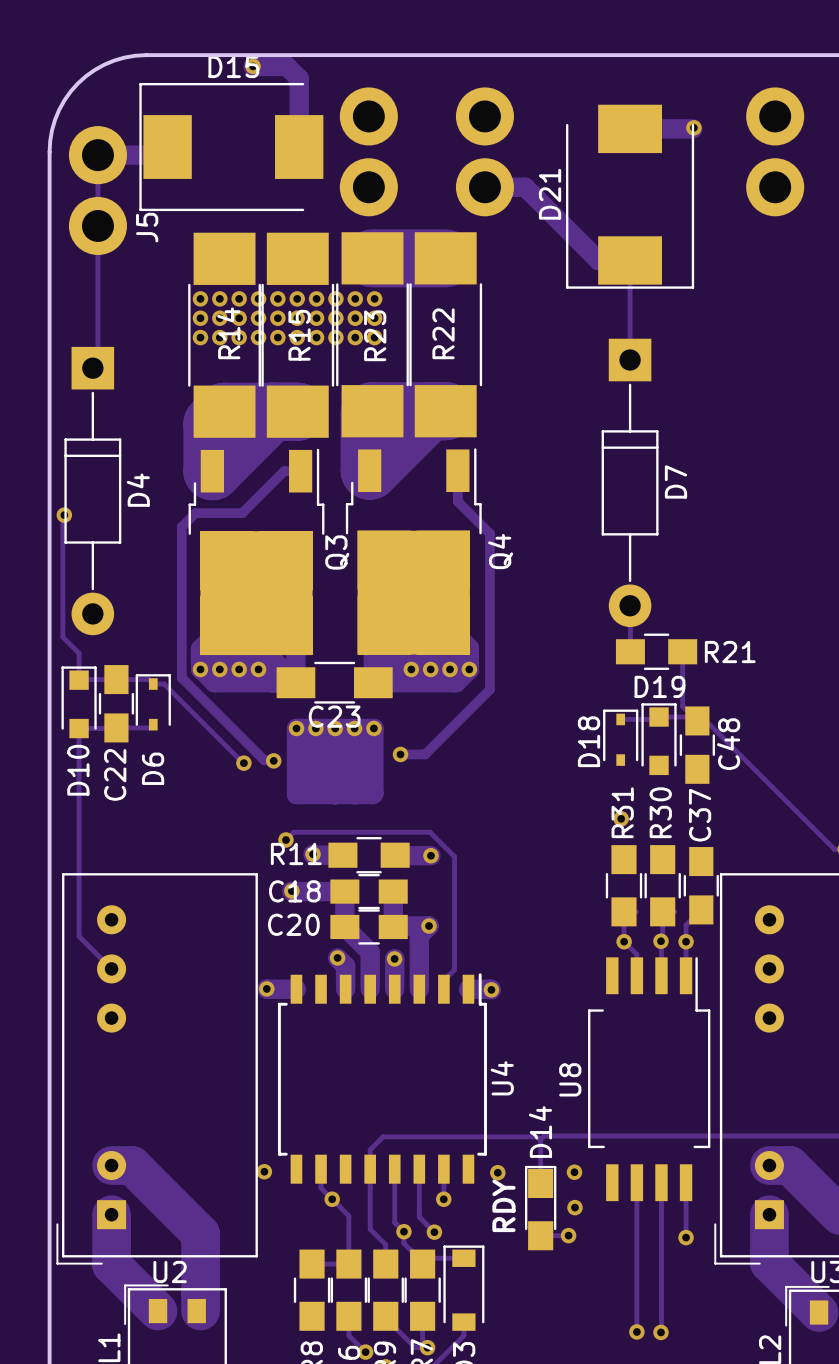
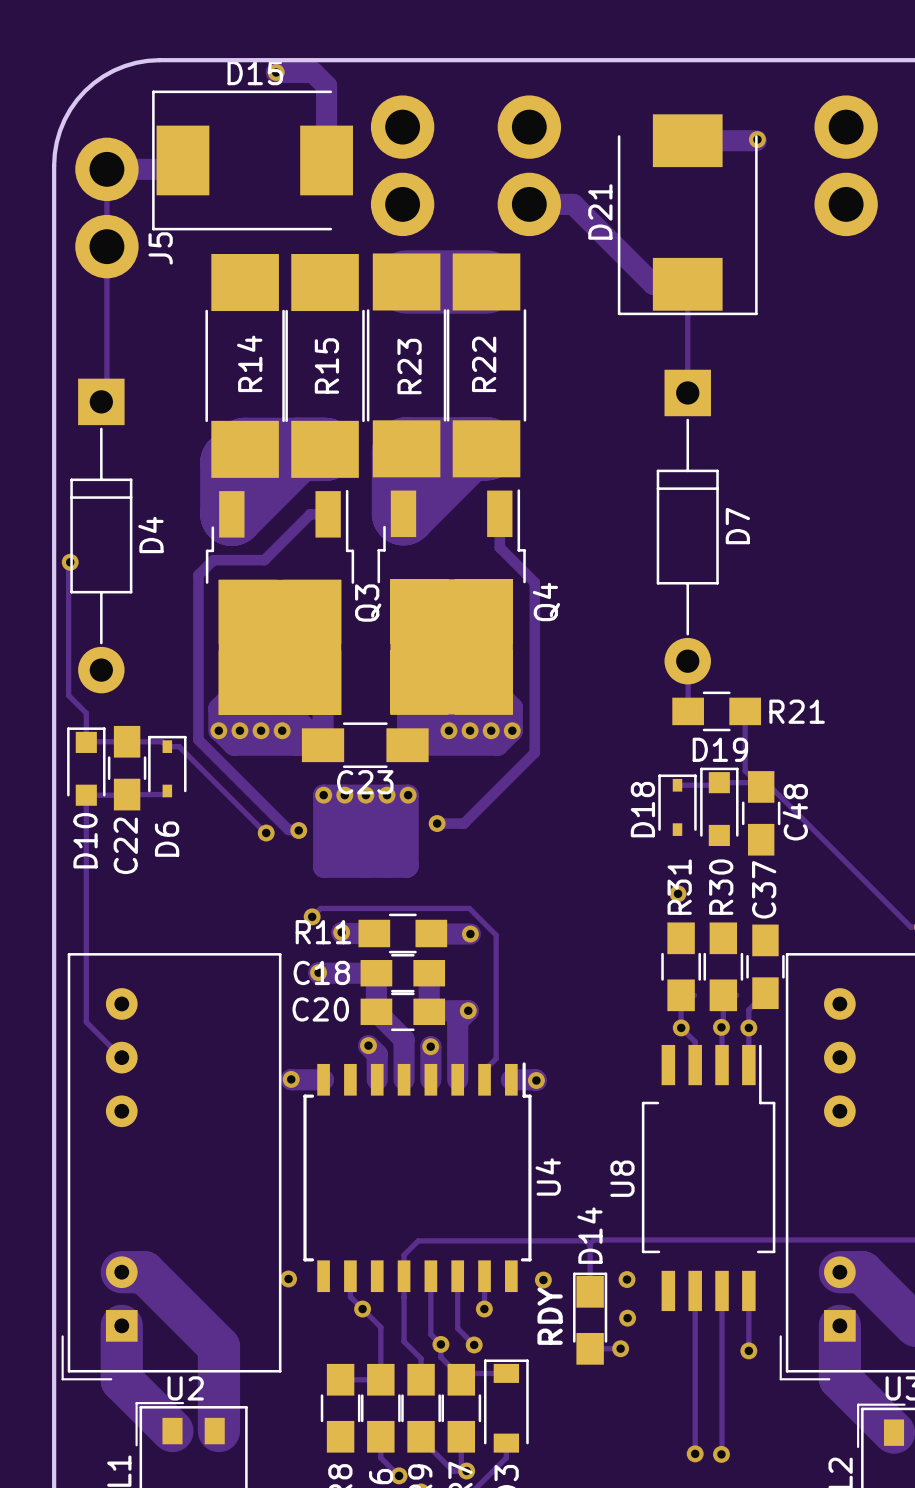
via: (200, 298) -> none
via: (219, 298) -> none
via: (239, 298) -> none
via: (258, 298) -> none
via: (277, 298) -> none
via: (297, 298) -> none
via: (316, 298) -> none
via: (335, 298) -> none
via: (355, 298) -> none
via: (374, 298) -> none
via: (200, 318) -> none
via: (219, 318) -> none
via: (239, 318) -> none
via: (258, 318) -> none
via: (277, 318) -> none
via: (297, 318) -> none
via: (316, 318) -> none
via: (335, 318) -> none
via: (355, 318) -> none
via: (374, 318) -> none
via: (200, 337) -> none
via: (219, 337) -> none
via: (239, 337) -> none
via: (258, 337) -> none
via: (277, 337) -> none
via: (297, 337) -> none
via: (316, 337) -> none
via: (335, 337) -> none
via: (355, 337) -> none
via: (374, 337) -> none

